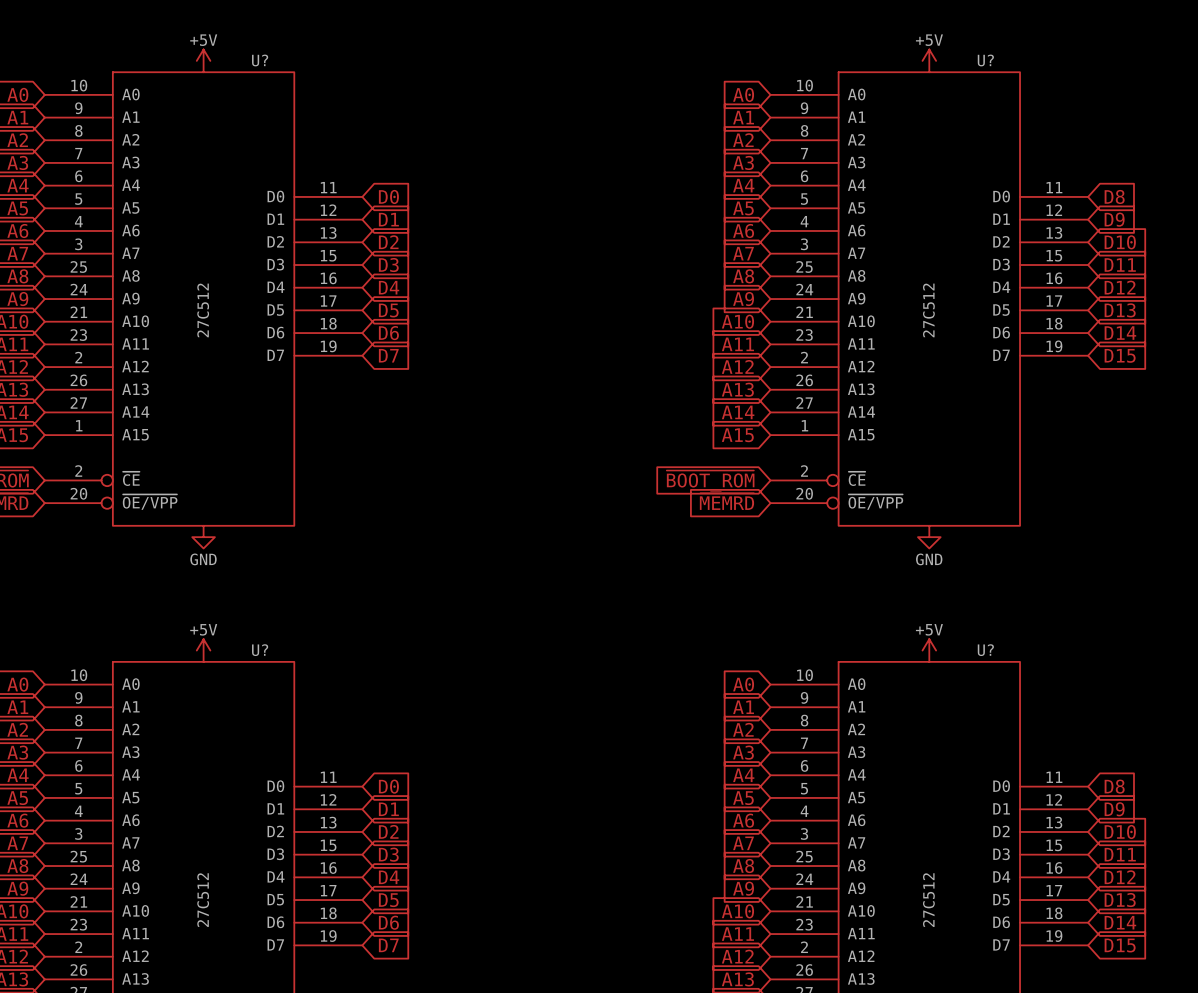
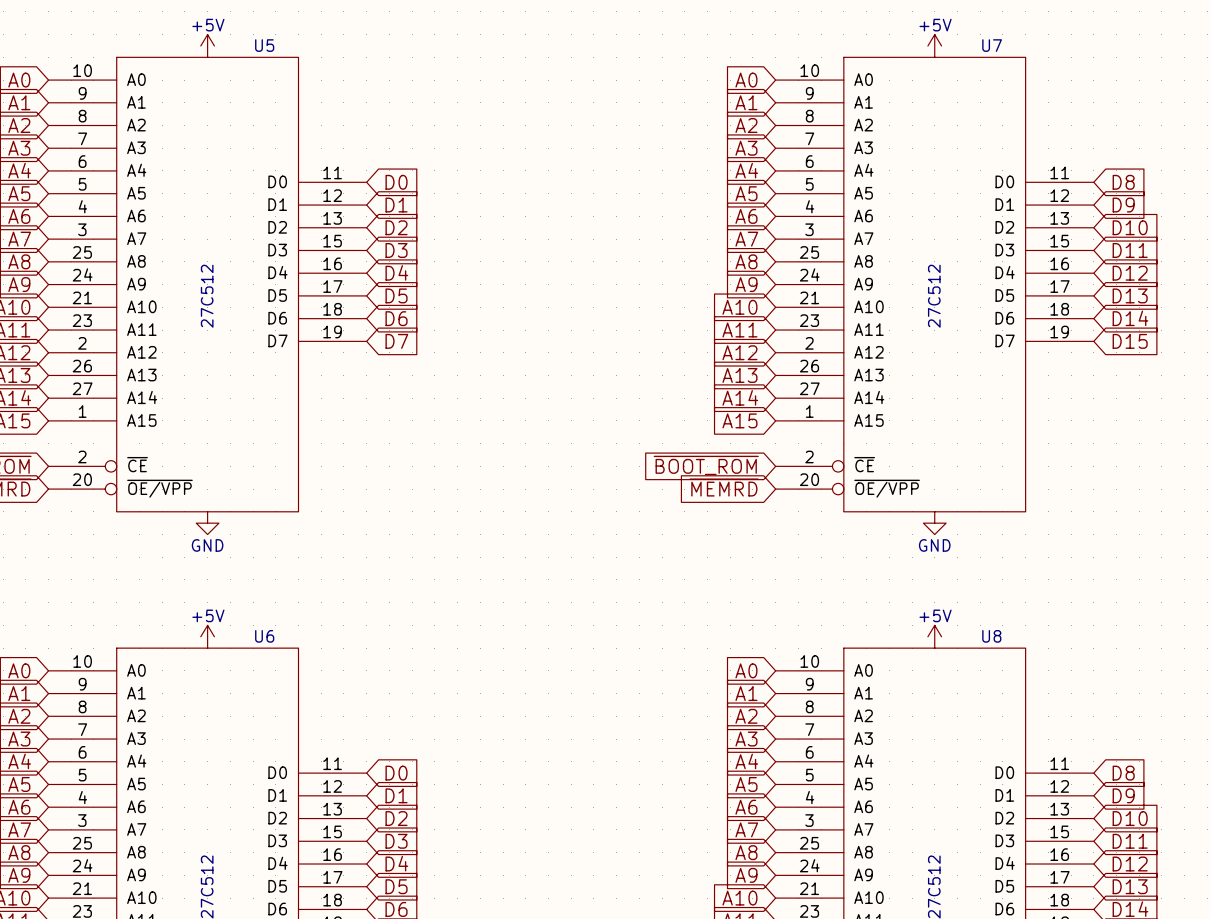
U? name: U? (260, 60) -> U5 (264, 45)
U? name: U? (985, 60) -> U7 (992, 45)
U? name: U? (260, 650) -> U6 (264, 636)
U? name: U? (985, 650) -> U8 (991, 636)

